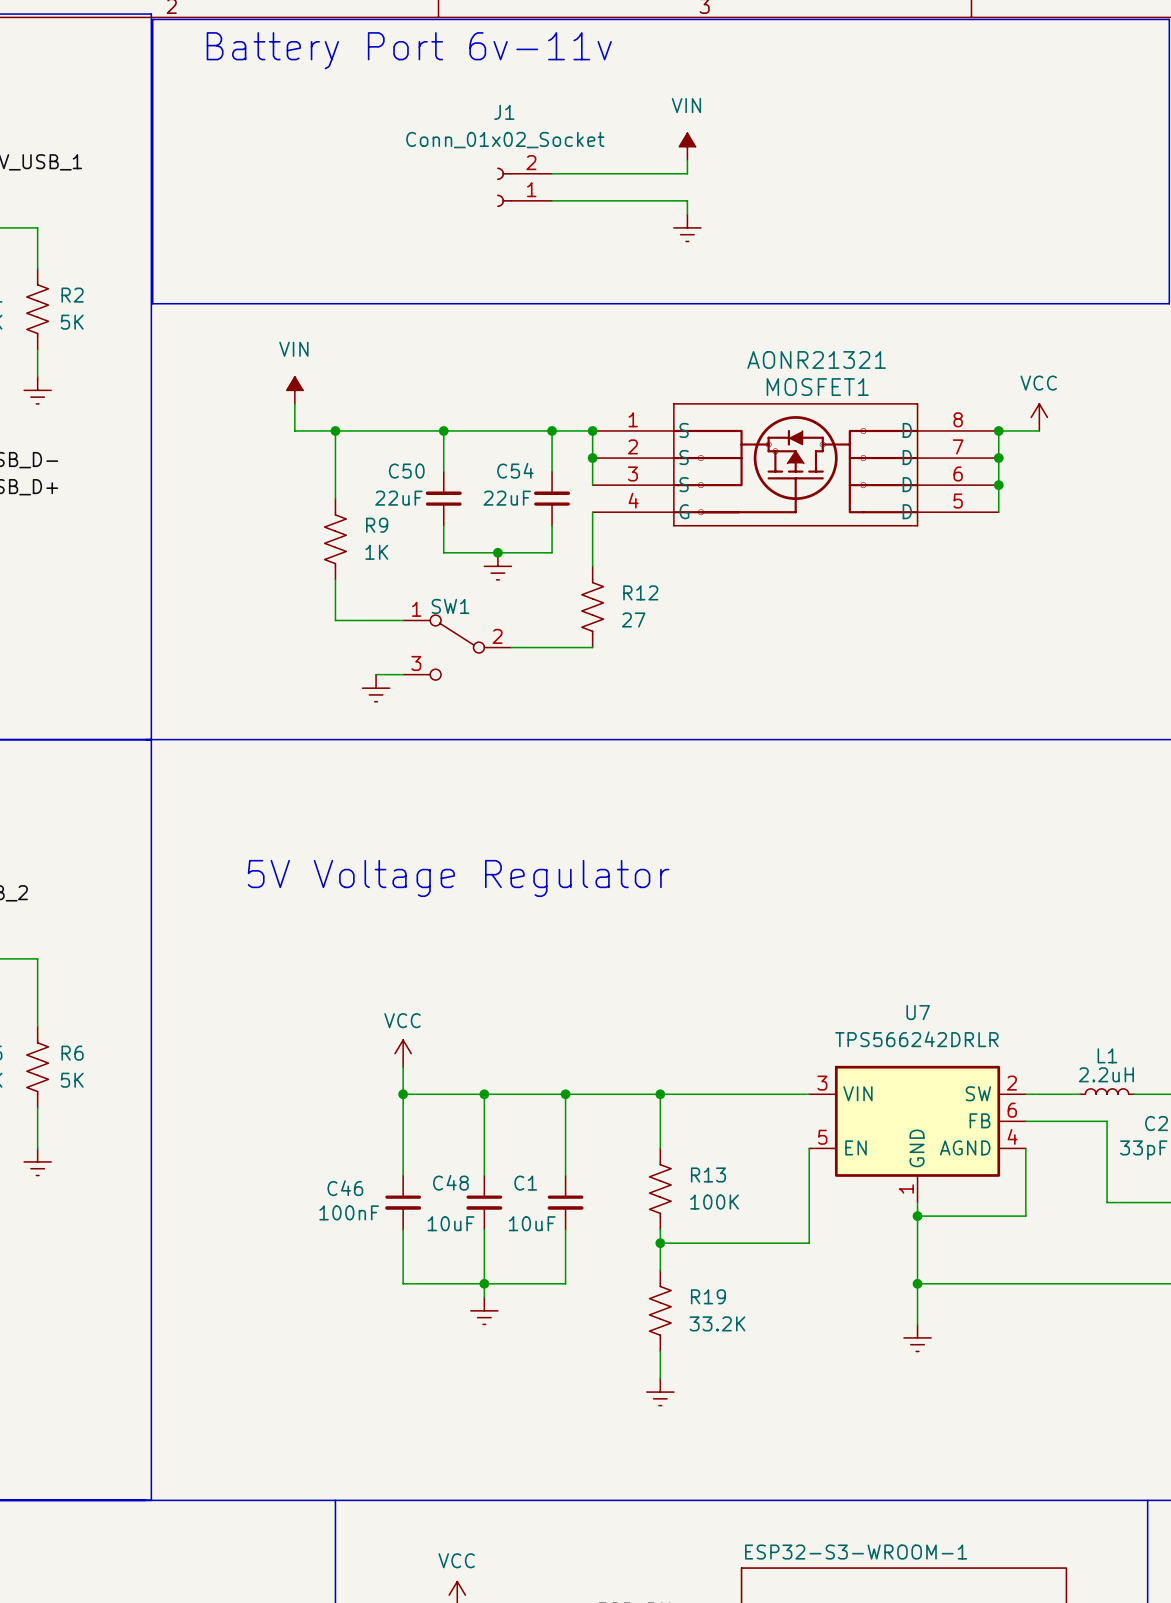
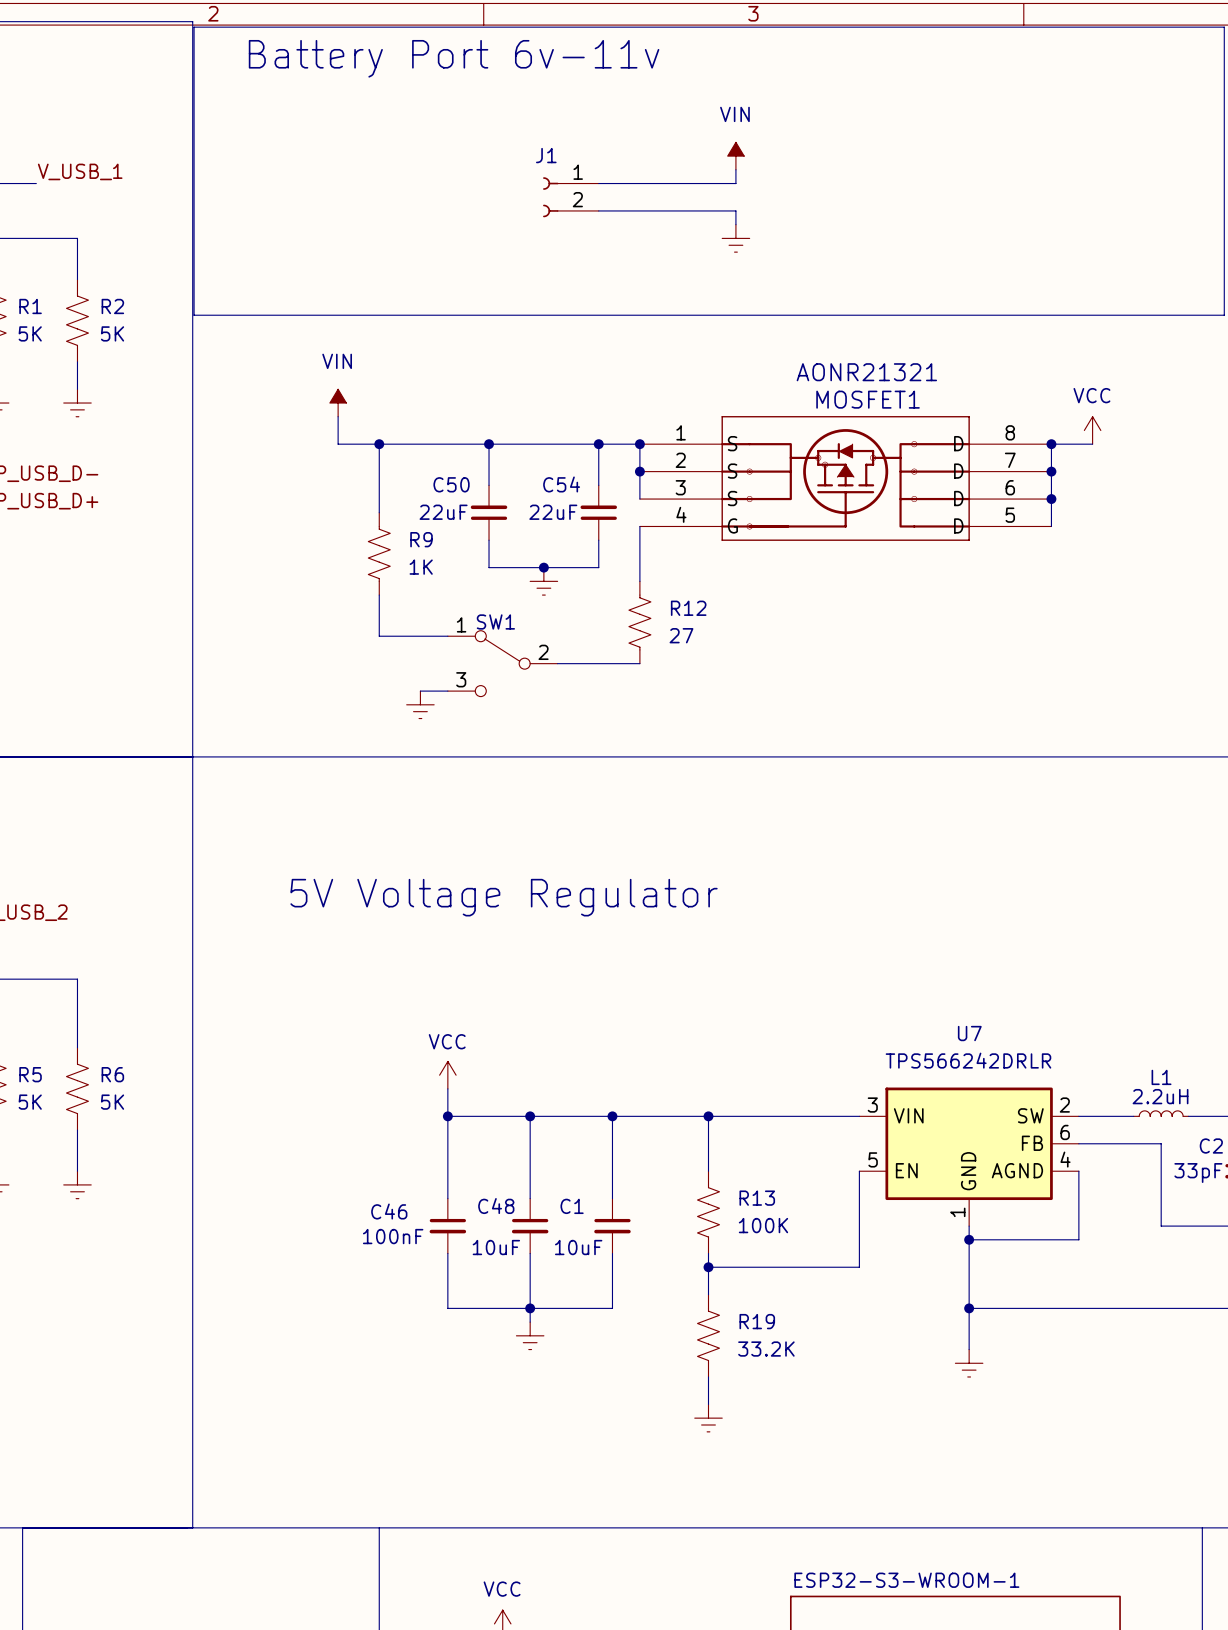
J1 name position: J1 (504, 112) -> J1 (546, 155)
J1 value: Conn_01x02_Socket (505, 140) -> none
J1 flip: as is (504, 187) -> up-down (550, 197)

